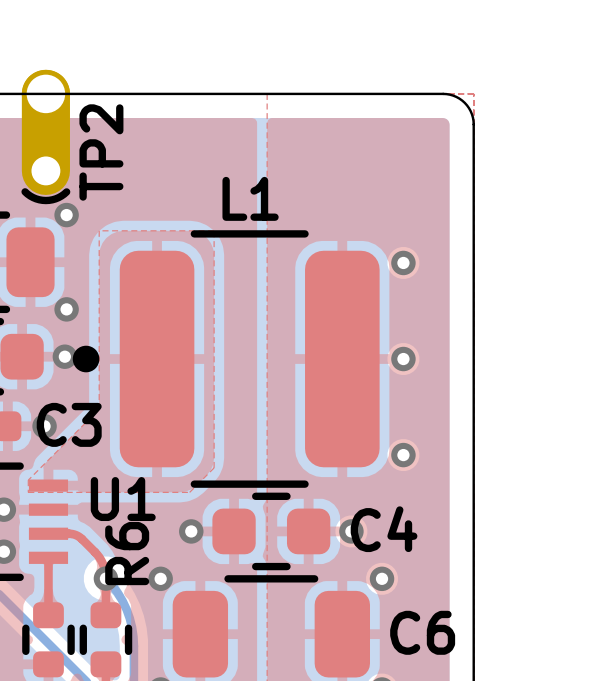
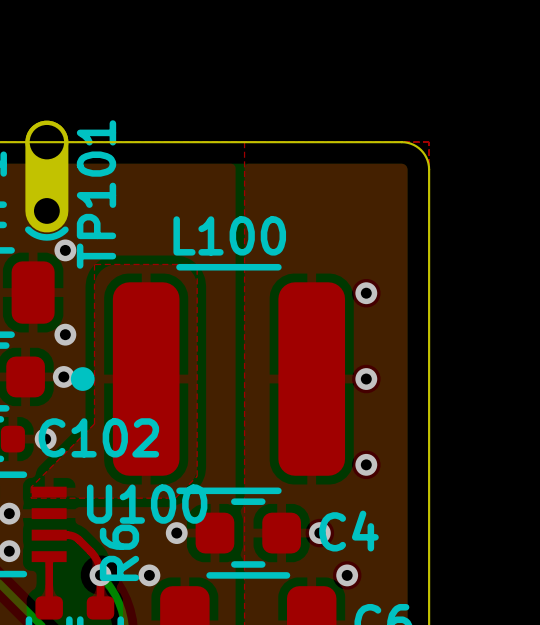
TP2 name: TP2 (101, 152) -> TP101 (96, 194)
L1 name: L1 (250, 198) -> L100 (229, 235)
C3 name: C3 (69, 424) -> C102 (98, 437)
U1 name: U1 (123, 499) -> U100 (147, 504)

